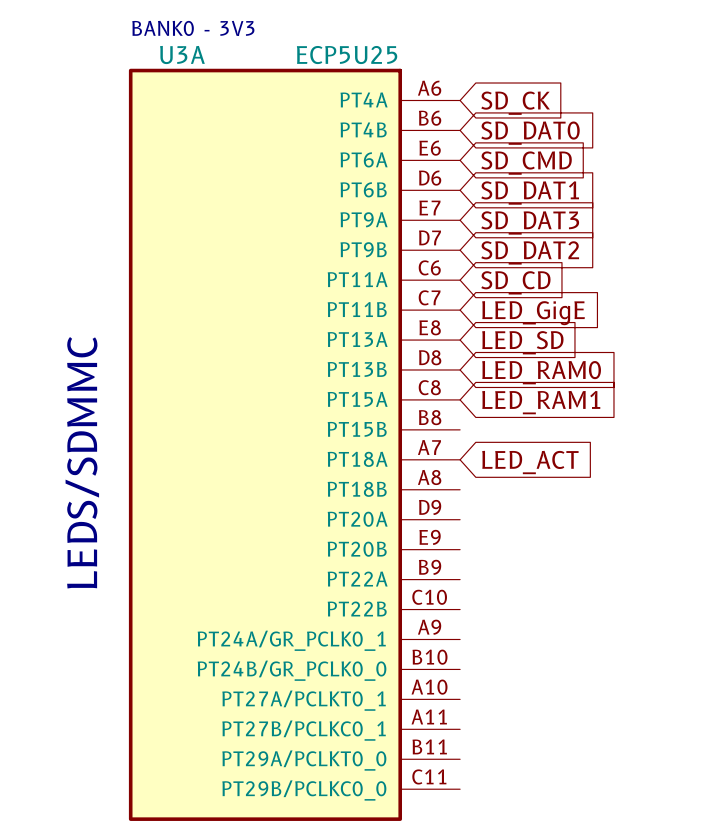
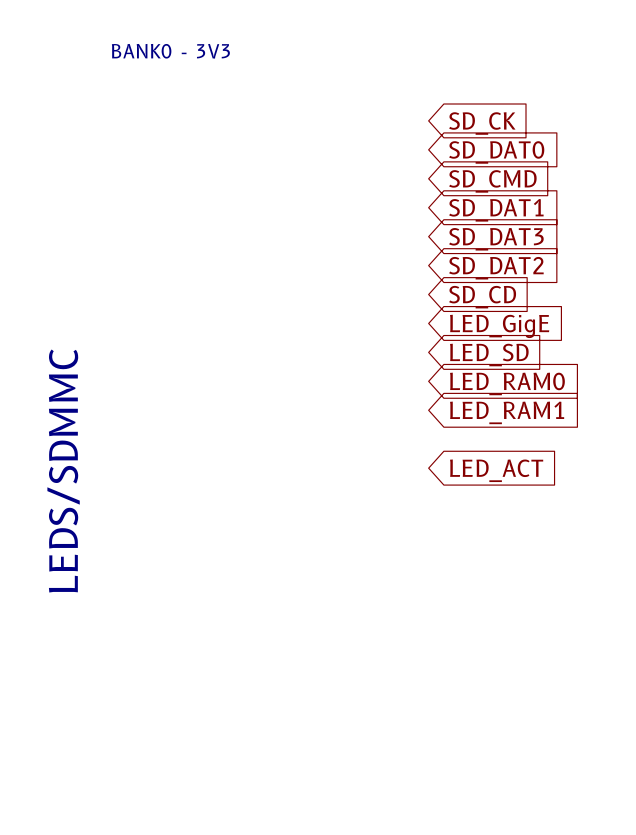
U3A: ECP5U25 (294, 444) -> none

